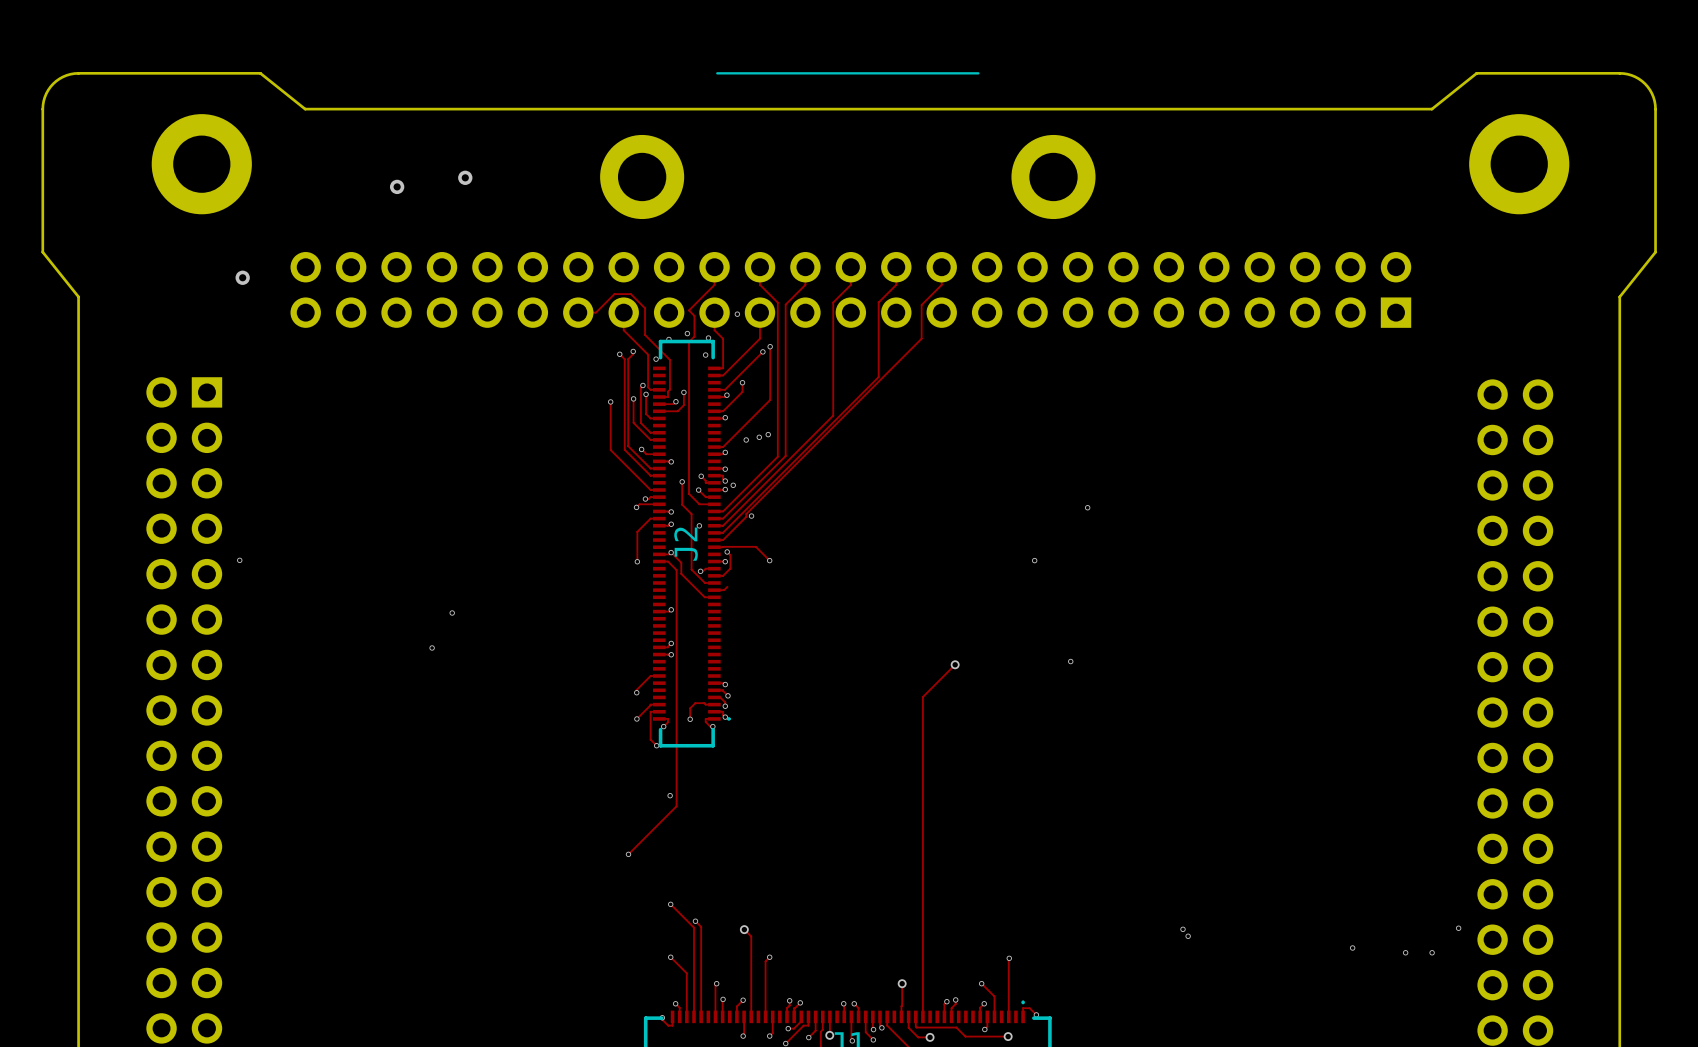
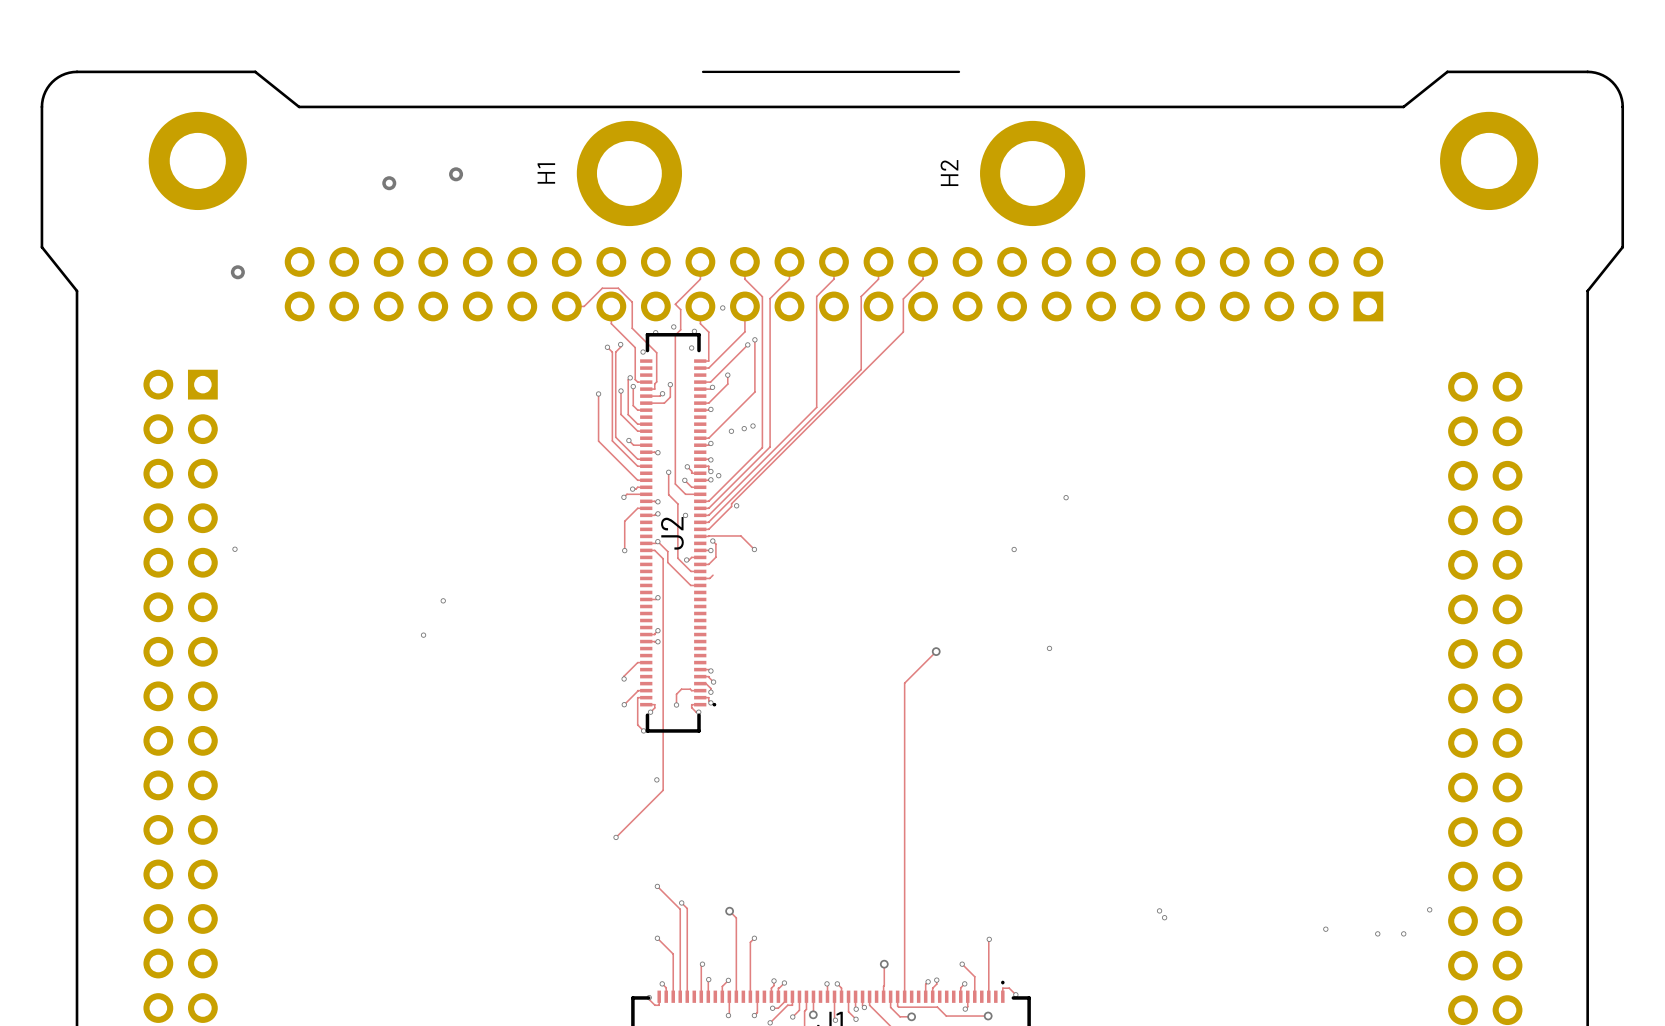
part: (642, 176) -> none
H1: none -> (629, 173)
part: (1053, 176) -> none
H2: none -> (1032, 173)

